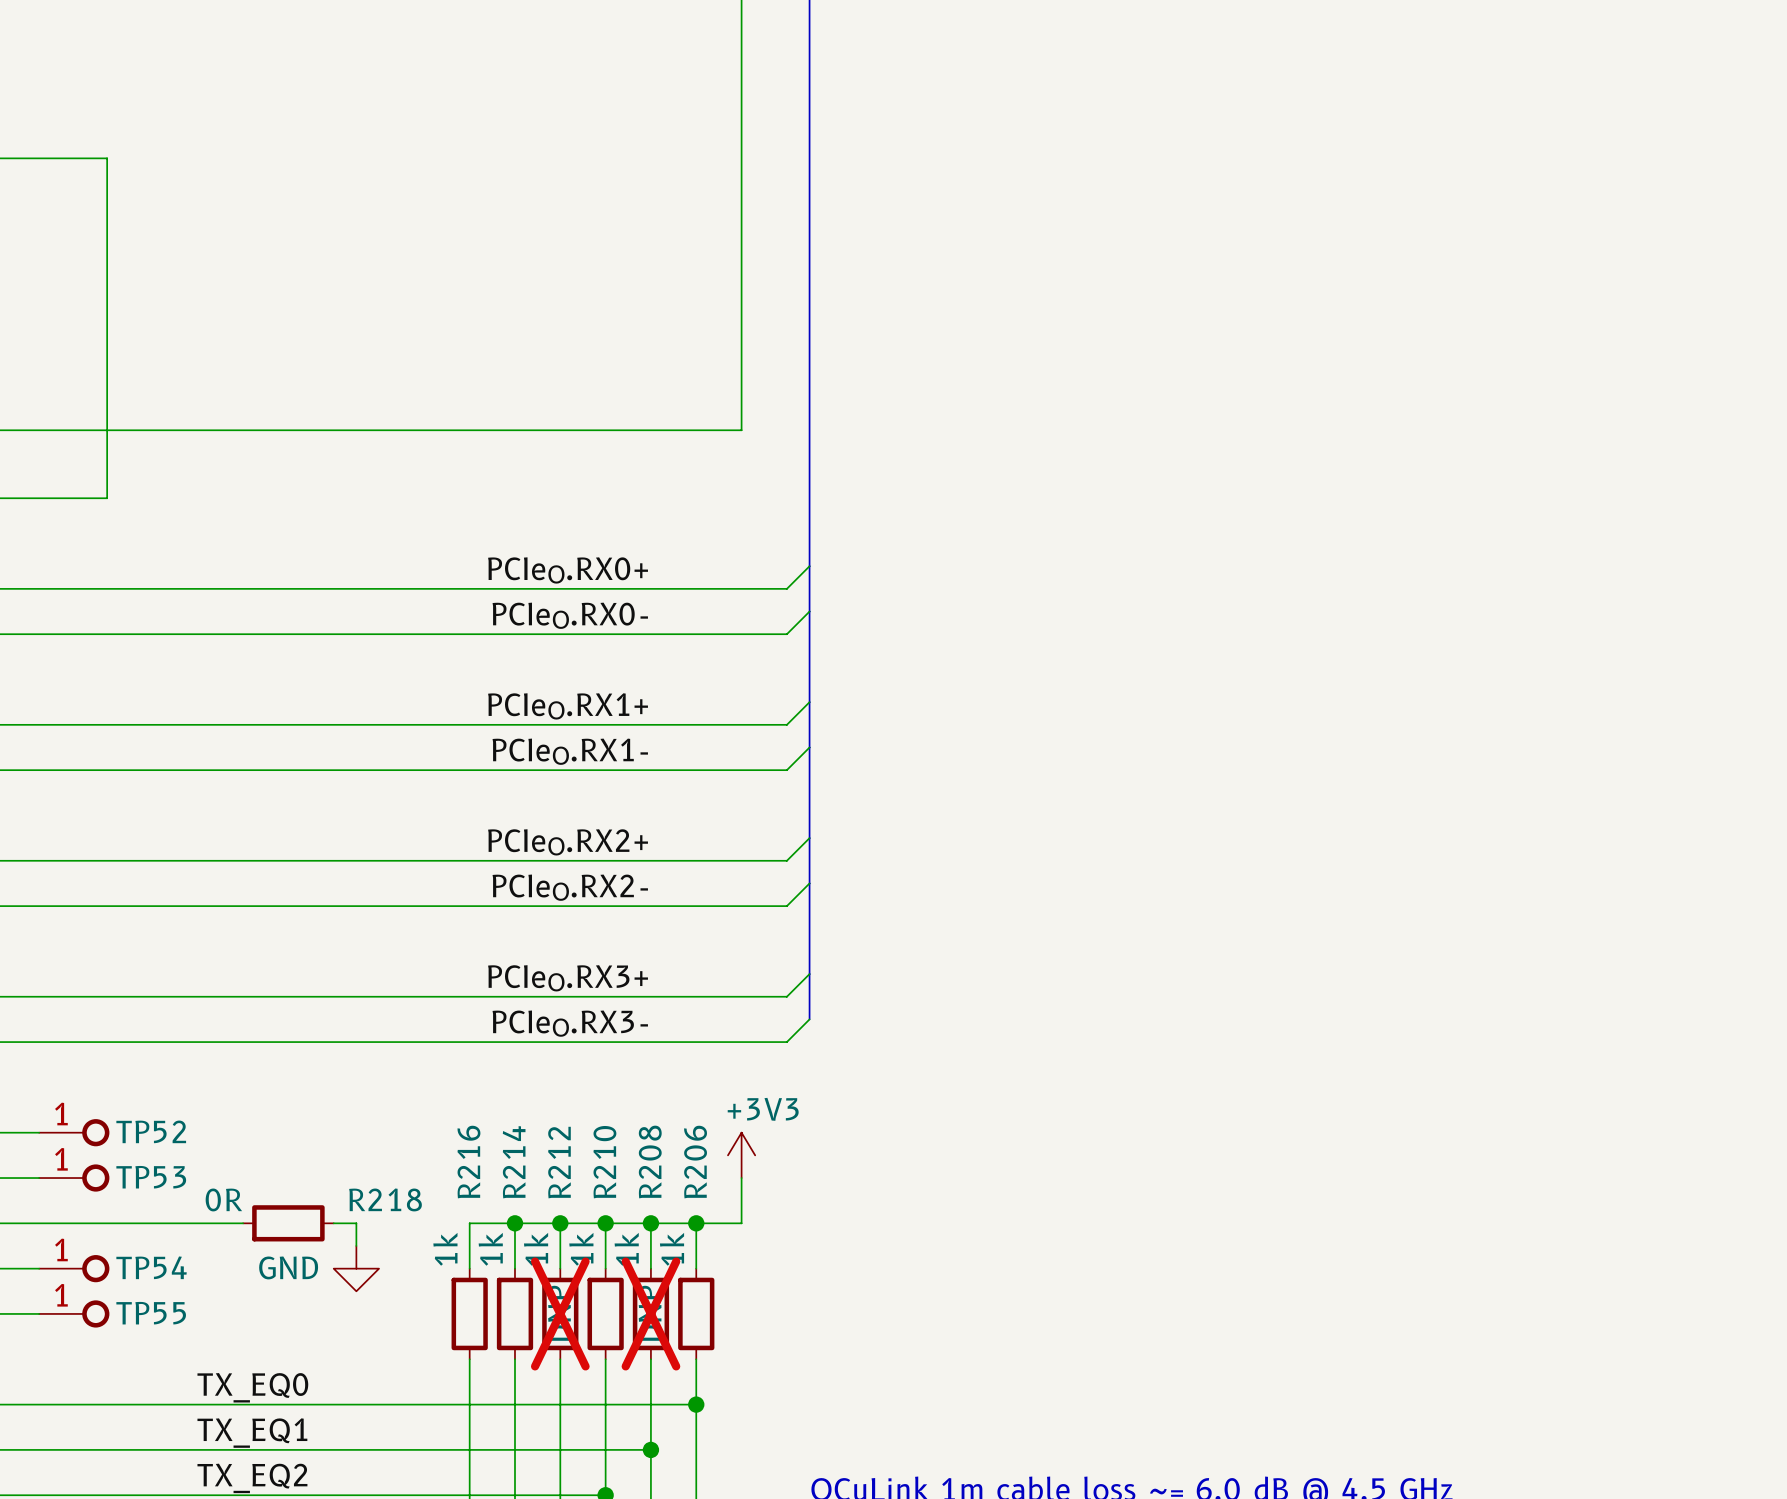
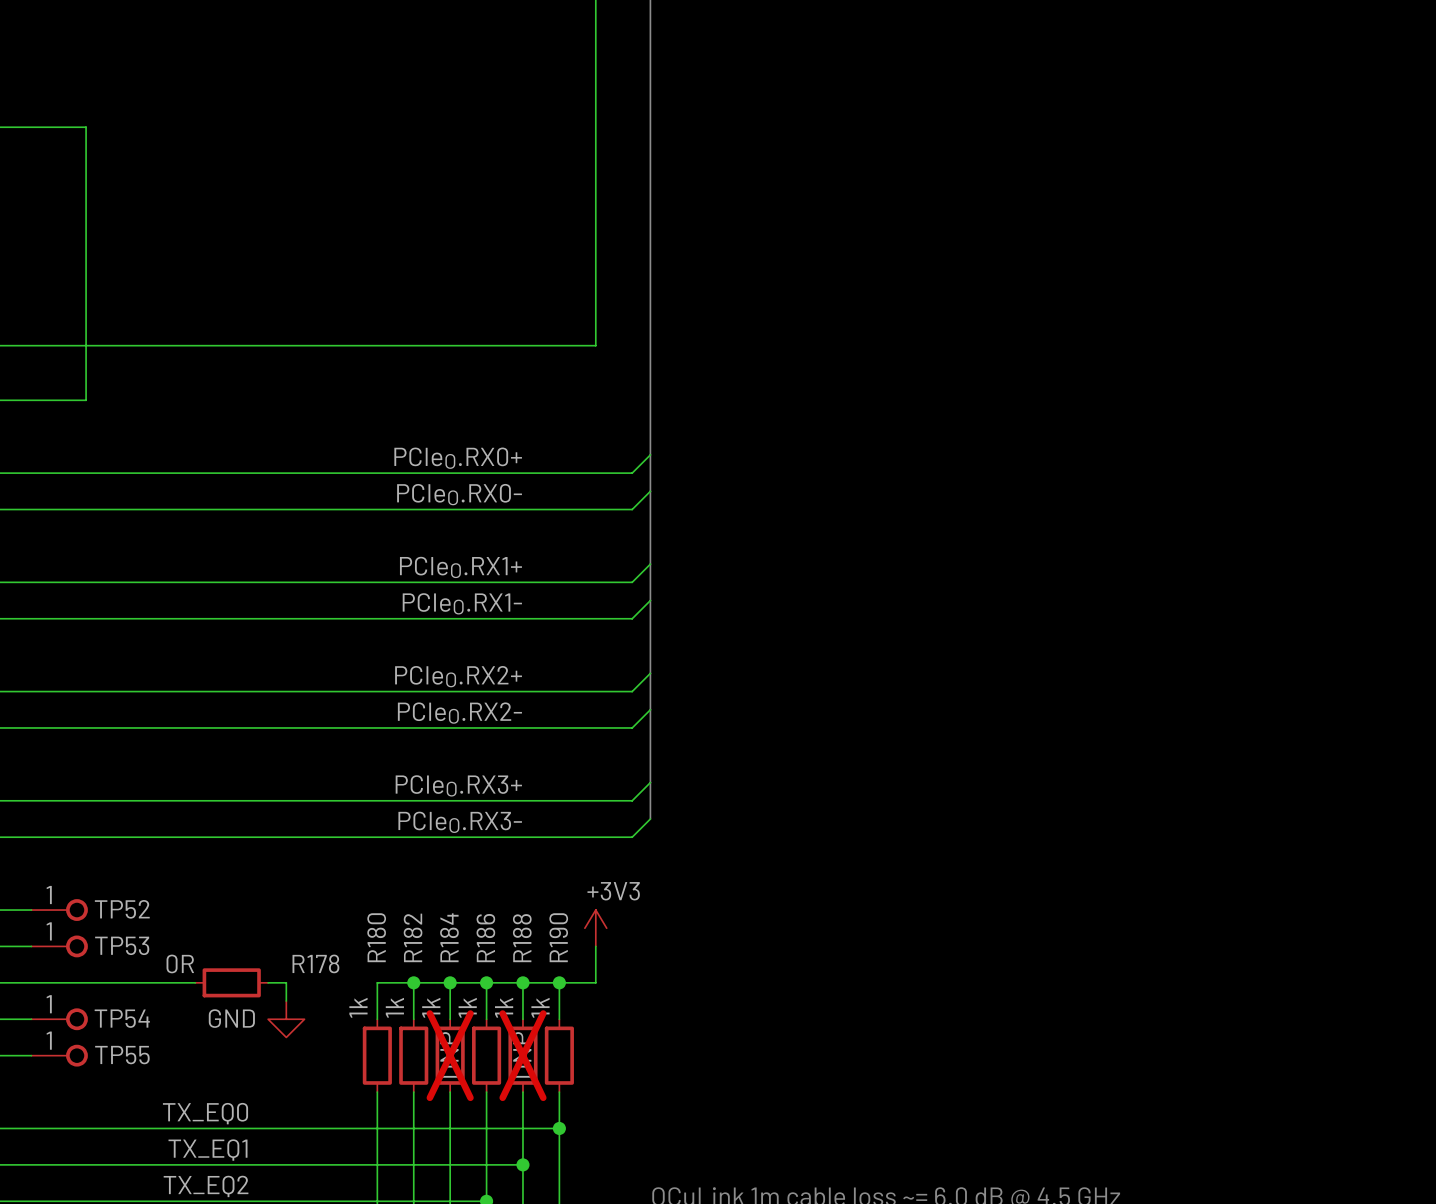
R216 name: R216 (468, 1162) -> R180 (376, 937)
R214 name: R214 (514, 1162) -> R182 (413, 937)
R212 name: R212 (559, 1162) -> R184 (449, 937)
R210 name: R210 (604, 1162) -> R186 (485, 938)
R208 name: R208 (650, 1162) -> R188 (522, 938)
R206 name: R206 (695, 1162) -> R190 (558, 937)
R218 name: R218 (385, 1199) -> R178 (315, 963)

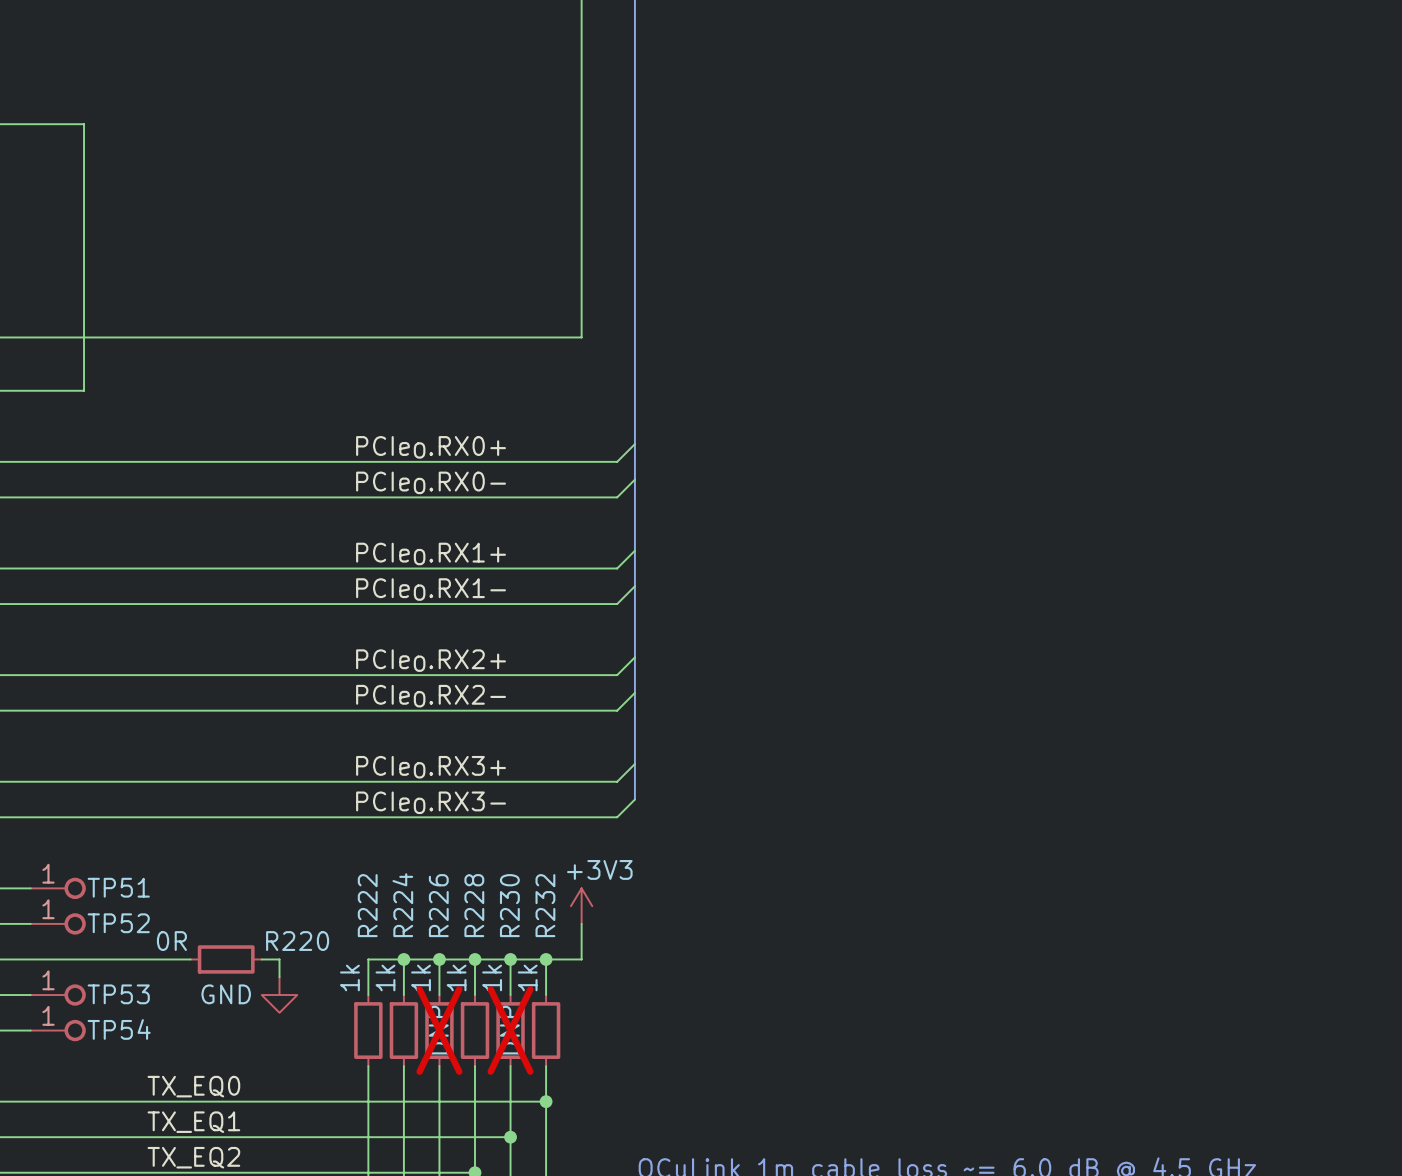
TP52 name: TP52 (122, 909) -> TP51 (118, 887)
R180 name: R180 (376, 937) -> R222 (367, 905)
R182 name: R182 (413, 937) -> R224 (402, 905)
R184 name: R184 (449, 937) -> R226 (438, 905)
R190 name: R190 (558, 937) -> R232 (545, 905)
R186 name: R186 (485, 938) -> R228 (474, 905)
R188 name: R188 (522, 938) -> R230 (509, 905)
TP53 name: TP53 (122, 945) -> TP52 (118, 923)
R178 name: R178 (315, 963) -> R220 (297, 941)
TP54 name: TP54 (122, 1018) -> TP53 (118, 994)
TP55 name: TP55 (122, 1055) -> TP54 (119, 1029)

